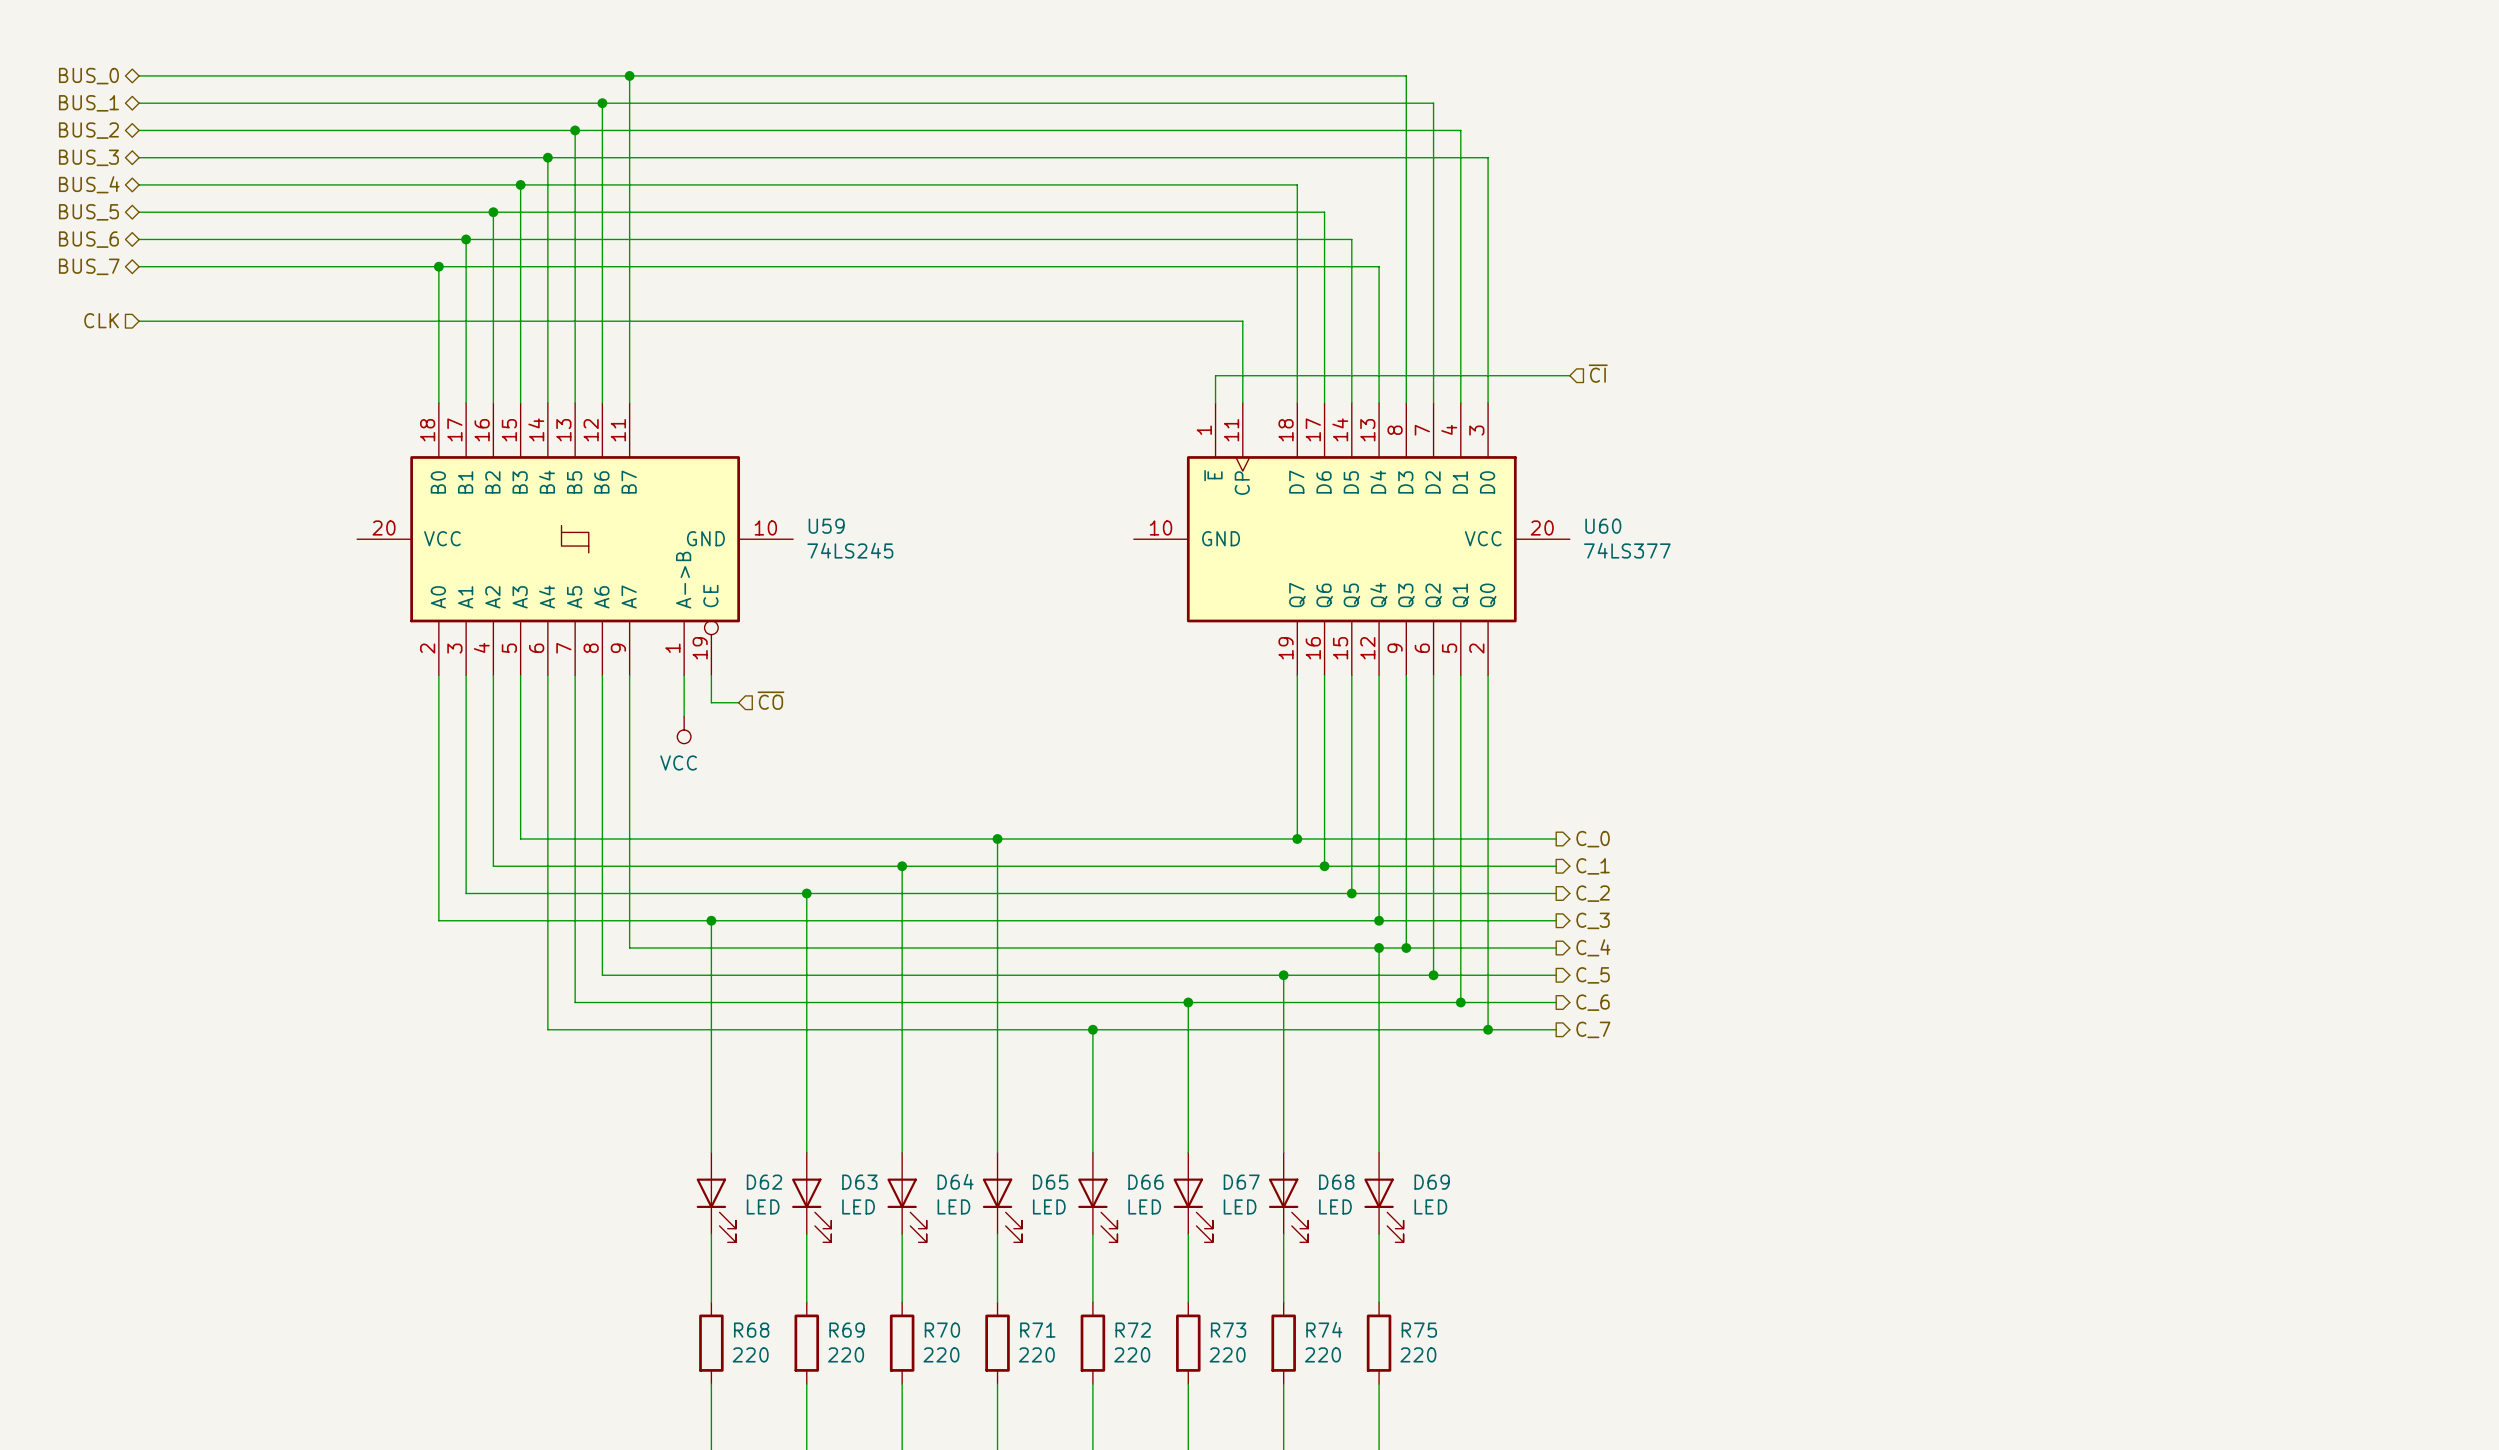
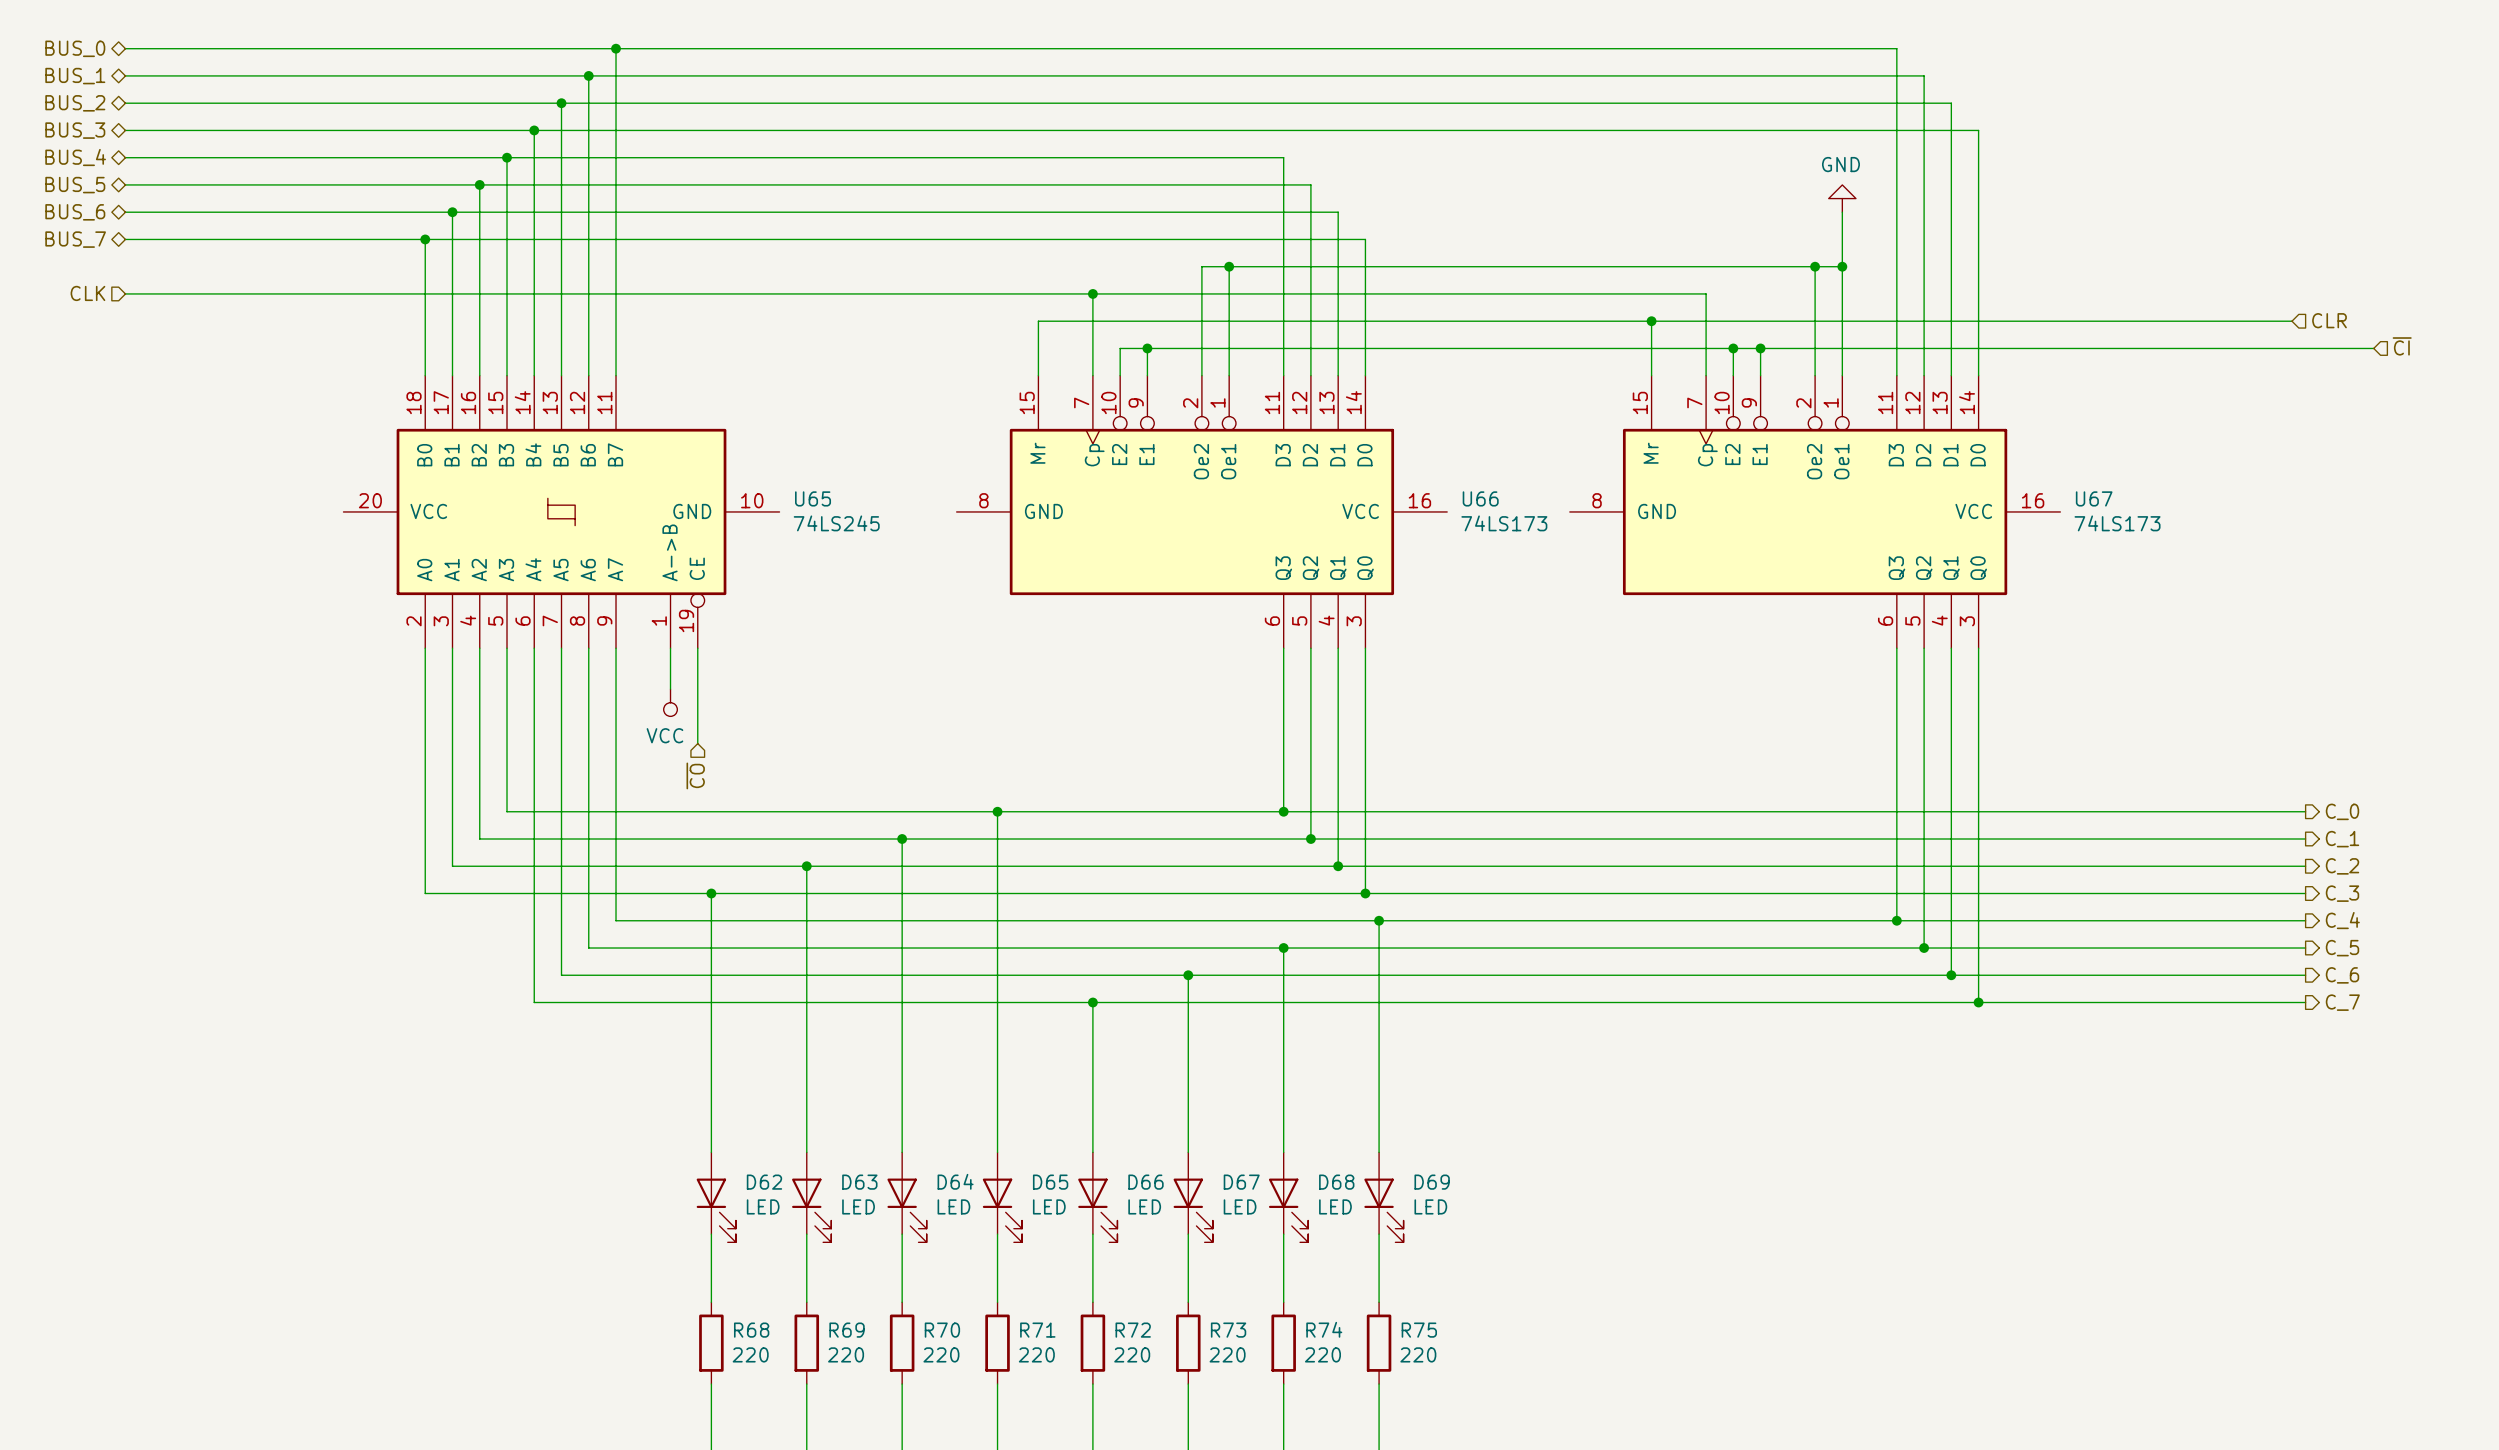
wire: none -> (125, 48) (1896, 48) (1896, 375)
junction: none -> (616, 48)
wire: none -> (125, 75) (139, 75)
junction: none -> (588, 75)
wire: (629, 75) (629, 402) -> (616, 48) (616, 375)
junction: (629, 75) -> none
wire: (1406, 75) (1406, 402) -> (1406, 75) (1924, 75) (1924, 375)
hierarchical label position: BUS_0 (88, 76) -> BUS_0 (75, 48)
hierarchical label position: BUS_1 (88, 103) -> BUS_1 (75, 76)
wire: none -> (125, 103) (139, 103)
junction: none -> (561, 103)
wire: (602, 103) (602, 402) -> (588, 75) (588, 375)
junction: (602, 103) -> none
wire: (1433, 103) (1433, 402) -> (1433, 103) (1951, 103) (1951, 375)
hierarchical label position: BUS_2 (88, 130) -> BUS_2 (75, 103)
wire: none -> (125, 130) (139, 130)
junction: none -> (534, 130)
wire: (575, 130) (575, 402) -> (561, 103) (561, 375)
junction: (575, 130) -> none
wire: (1460, 130) (1460, 402) -> (1460, 130) (1978, 130) (1978, 375)
hierarchical label position: BUS_3 (88, 157) -> BUS_3 (75, 130)
wire: none -> (125, 157) (139, 157)
junction: none -> (507, 157)
wire: (547, 157) (547, 402) -> (534, 130) (534, 375)
junction: (547, 157) -> none
wire: (1283, 157) (1488, 157) (1488, 402) -> (1283, 157) (1283, 375)
hierarchical label position: BUS_4 (89, 184) -> BUS_4 (75, 157)
wire: none -> (125, 184) (139, 184)
junction: none -> (479, 184)
wire: (520, 184) (520, 402) -> (507, 157) (507, 375)
junction: (520, 184) -> none
wire: (1297, 184) (1297, 402) -> (1297, 184) (1310, 184) (1310, 375)
power symbol: none -> GND (1842, 198)
hierarchical label position: BUS_5 (88, 212) -> BUS_5 (75, 185)
wire: none -> (125, 212) (139, 212)
junction: none -> (452, 212)
wire: (493, 212) (493, 402) -> (479, 184) (479, 375)
junction: (493, 212) -> none
wire: (1324, 212) (1324, 402) -> (1324, 212) (1338, 212) (1338, 375)
wire: none -> (1842, 212) (1842, 375)
hierarchical label position: BUS_6 (88, 239) -> BUS_6 (75, 212)
wire: none -> (125, 239) (139, 239)
junction: none -> (425, 239)
wire: (466, 239) (466, 402) -> (452, 212) (452, 375)
junction: (466, 239) -> none
wire: (1351, 239) (1351, 402) -> (1351, 239) (1365, 239) (1365, 375)
hierarchical label position: BUS_7 (89, 266) -> BUS_7 (75, 239)
wire: (139, 266) (1201, 266) -> (1201, 375) (1201, 266)
wire: (438, 266) (438, 402) -> (425, 239) (425, 375)
junction: (438, 266) -> none
wire: none -> (1229, 266) (1229, 375)
junction: none -> (1229, 266)
wire: (1379, 266) (1379, 402) -> (1379, 266) (1842, 266)
wire: none -> (1815, 266) (1815, 375)
junction: none -> (1815, 266)
junction: none -> (1842, 266)
wire: none -> (125, 293) (1706, 293) (1706, 375)
wire: none -> (1092, 293) (1092, 375)
junction: none -> (1092, 293)
hierarchical label position: CLK (101, 320) -> CLK (87, 293)
hierarchical label: none -> CLR (2329, 320)
wire: (139, 321) (1038, 321) -> (1038, 375) (1038, 321)
wire: (1242, 321) (1242, 402) -> (1242, 321) (2291, 321)
wire: none -> (1651, 321) (1651, 375)
junction: none -> (1651, 321)
hierarchical label: none -> ~{CI} (2402, 346)
wire: none -> (1147, 348) (1147, 375)
junction: none -> (1147, 348)
wire: none -> (1733, 348) (1733, 375)
junction: none -> (1733, 348)
wire: none -> (1760, 348) (1760, 375)
junction: none -> (1760, 348)
wire: none -> (2373, 348) (1120, 348) (1120, 375)
hierarchical label: ~{CI} (1598, 373) -> none
wire: (1569, 375) (1215, 375) (1215, 402) -> none
U65: none -> 74LS245 (561, 511)
U66: none -> 74LS173 (1201, 511)
U67: none -> 74LS173 (1815, 511)
U59: 74LS245 (575, 539) -> none
U60: 74LS377 (1351, 539) -> none
wire: none -> (507, 648) (507, 811) (2305, 811)
wire: none -> (697, 648) (697, 743)
wire: none -> (1365, 648) (1365, 893)
wire: none -> (1896, 648) (1896, 920)
wire: none -> (1924, 648) (1924, 948)
wire: none -> (1951, 648) (1951, 975)
wire: none -> (1978, 648) (1978, 1002)
wire: (438, 675) (438, 920) (616, 920) -> (616, 648) (616, 920)
wire: (466, 675) (466, 893) -> (425, 648) (425, 893) (466, 893)
wire: (493, 675) (493, 866) -> (452, 648) (452, 866) (493, 866)
wire: (520, 675) (520, 838) -> (479, 648) (479, 838) (520, 838)
wire: (547, 675) (547, 1029) (1556, 1029) -> none
wire: (575, 675) (575, 1002) -> (534, 648) (534, 1002) (575, 1002)
wire: (602, 675) (602, 975) -> (561, 648) (561, 975) (602, 975)
wire: (629, 675) (629, 948) -> (588, 648) (588, 948) (629, 948)
wire: (684, 675) (684, 716) -> (670, 648) (670, 689)
wire: (711, 675) (711, 702) (738, 702) -> none
wire: (1297, 675) (1297, 838) -> (1283, 648) (1283, 811)
wire: (1324, 675) (1324, 866) -> (1310, 648) (1310, 838)
wire: (1351, 675) (1351, 893) -> (1338, 648) (1338, 866)
wire: (1379, 675) (1379, 920) -> (1379, 948) (1379, 920)
wire: (1406, 675) (1406, 948) -> none
wire: (1433, 675) (1433, 975) -> none
wire: (1460, 675) (1460, 1002) -> none
wire: (1488, 675) (1488, 1029) -> none
hierarchical label rotation: 0° (770, 700) -> 90° clockwise (695, 775)
hierarchical label position: ~{CO} (770, 700) -> ~{CO} (695, 775)
power symbol position: VCC (684, 729) -> VCC (670, 702)
wire: none -> (997, 811) (997, 838)
junction: none -> (1283, 811)
hierarchical label: none -> C_0 (2342, 811)
wire: none -> (902, 838) (902, 866)
junction position: (997, 838) -> (997, 811)
junction position: (1297, 838) -> (1310, 838)
wire: none -> (1556, 838) (2305, 838)
hierarchical label: C_0 (1593, 839) -> none
hierarchical label: none -> C_1 (2342, 839)
wire: none -> (806, 866) (806, 893)
junction position: (902, 866) -> (902, 838)
junction position: (1324, 866) -> (1338, 866)
wire: none -> (1556, 866) (2305, 866)
hierarchical label: C_1 (1593, 866) -> none
hierarchical label: none -> C_2 (2342, 866)
wire: none -> (711, 893) (711, 920)
junction position: (806, 893) -> (806, 866)
junction position: (1351, 893) -> (1365, 893)
wire: none -> (1556, 893) (2305, 893)
hierarchical label: C_2 (1593, 893) -> none
hierarchical label: none -> C_3 (2342, 893)
junction position: (711, 920) -> (711, 893)
wire: none -> (1556, 920) (2305, 920)
hierarchical label: C_3 (1593, 920) -> none
junction: none -> (1896, 920)
hierarchical label: none -> C_4 (2342, 920)
hierarchical label: C_4 (1593, 947) -> none
wire: none -> (1283, 948) (1283, 975)
junction: (1379, 948) -> none
junction: (1406, 948) -> none
wire: none -> (1556, 948) (2305, 948)
junction: none -> (1924, 948)
hierarchical label: none -> C_5 (2342, 948)
wire: none -> (1188, 975) (1188, 1002)
junction position: (1283, 975) -> (1283, 948)
junction: (1433, 975) -> none
wire: none -> (1556, 975) (2305, 975)
hierarchical label: C_5 (1593, 975) -> none
junction: none -> (1951, 975)
hierarchical label: none -> C_6 (2342, 975)
wire: none -> (1092, 1002) (1092, 1029)
junction position: (1188, 1002) -> (1188, 975)
junction: (1460, 1002) -> none
wire: none -> (1556, 1002) (2305, 1002)
hierarchical label: C_6 (1593, 1002) -> none
junction: none -> (1978, 1002)
hierarchical label: none -> C_7 (2342, 1002)
junction position: (1092, 1029) -> (1092, 1002)
junction: (1488, 1029) -> none
hierarchical label: C_7 (1593, 1029) -> none

